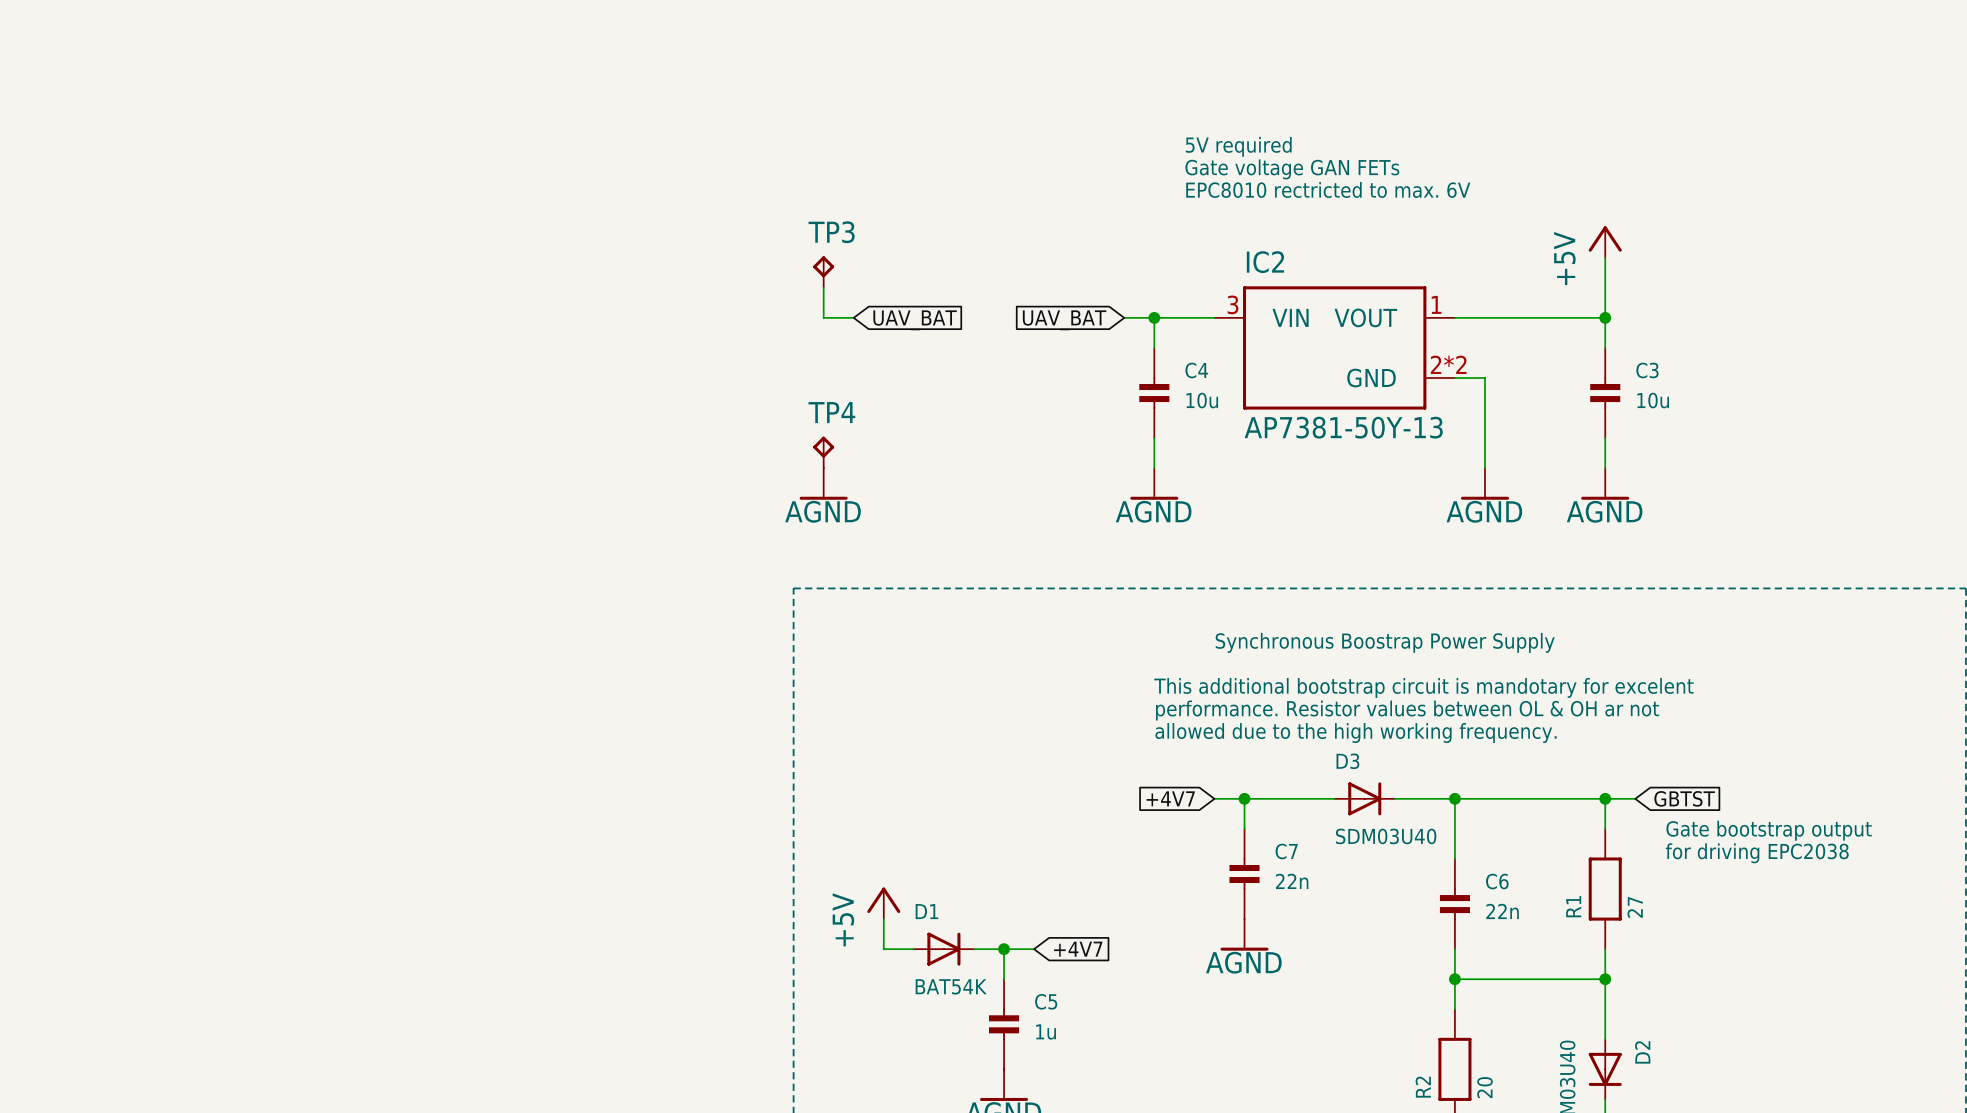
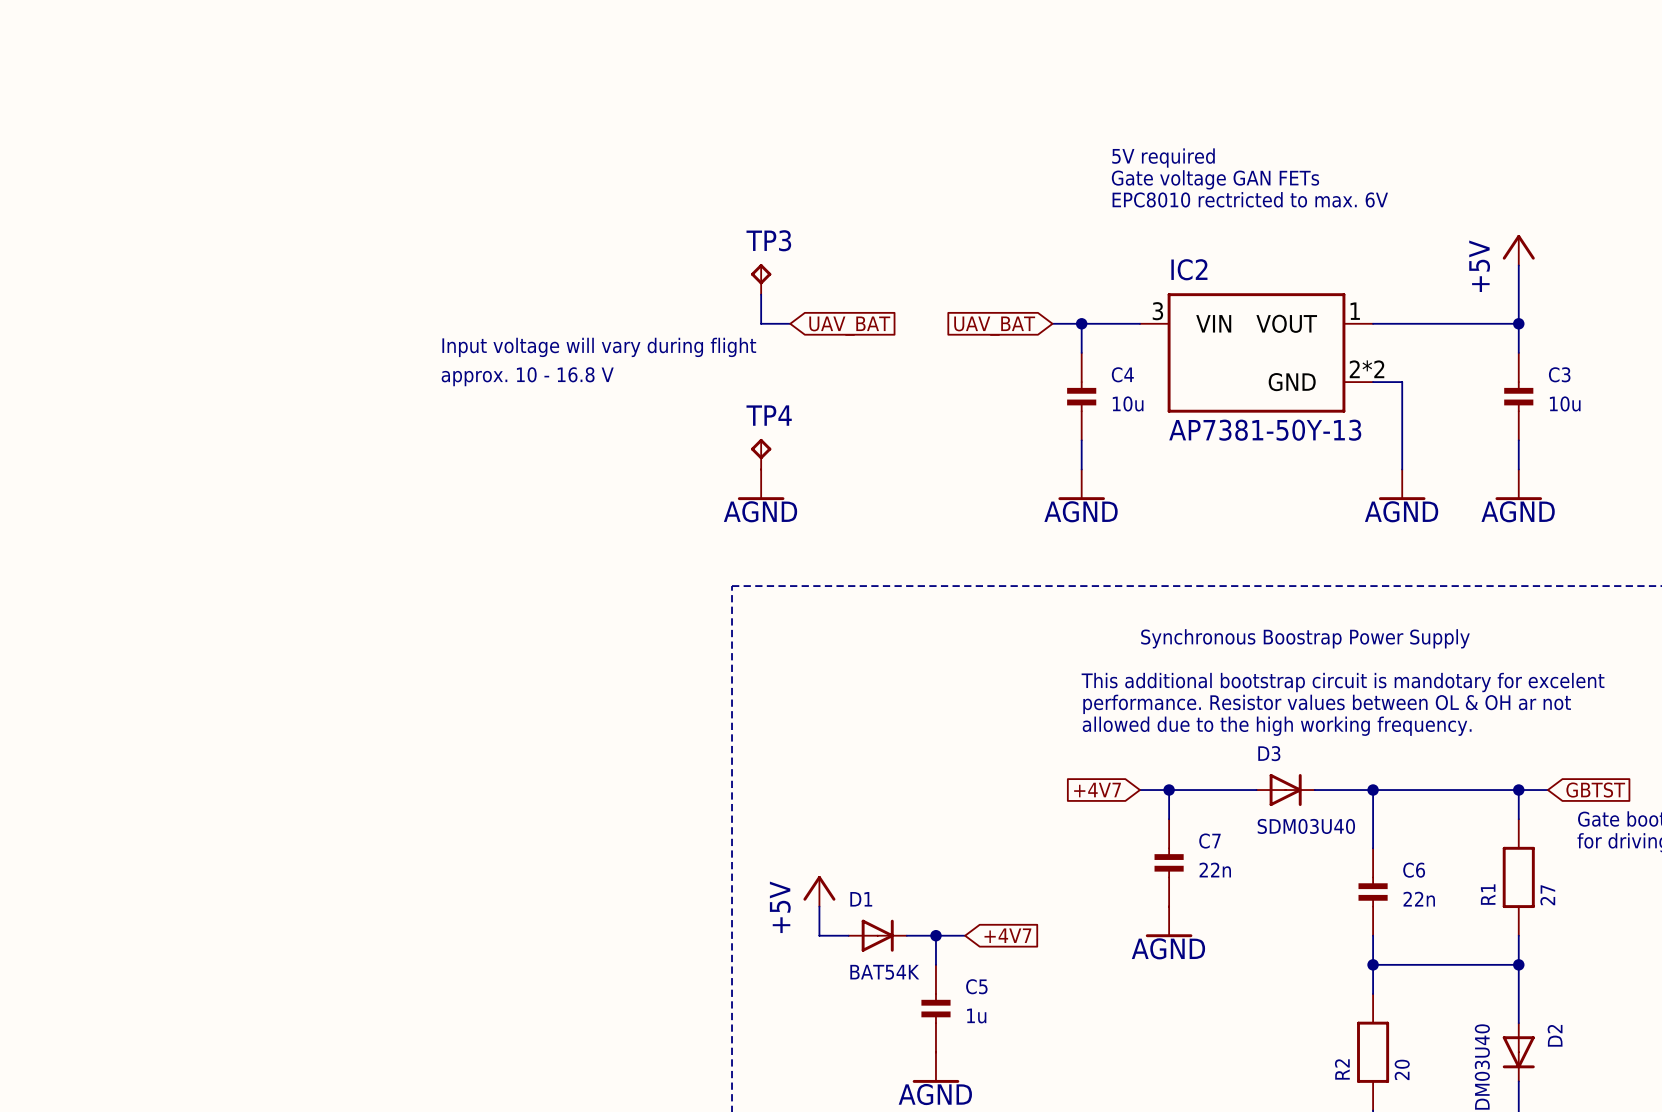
text: none -> Input voltage will vary during flight (599, 347)
text: none -> approx. 10 - 16.8 V (527, 376)

